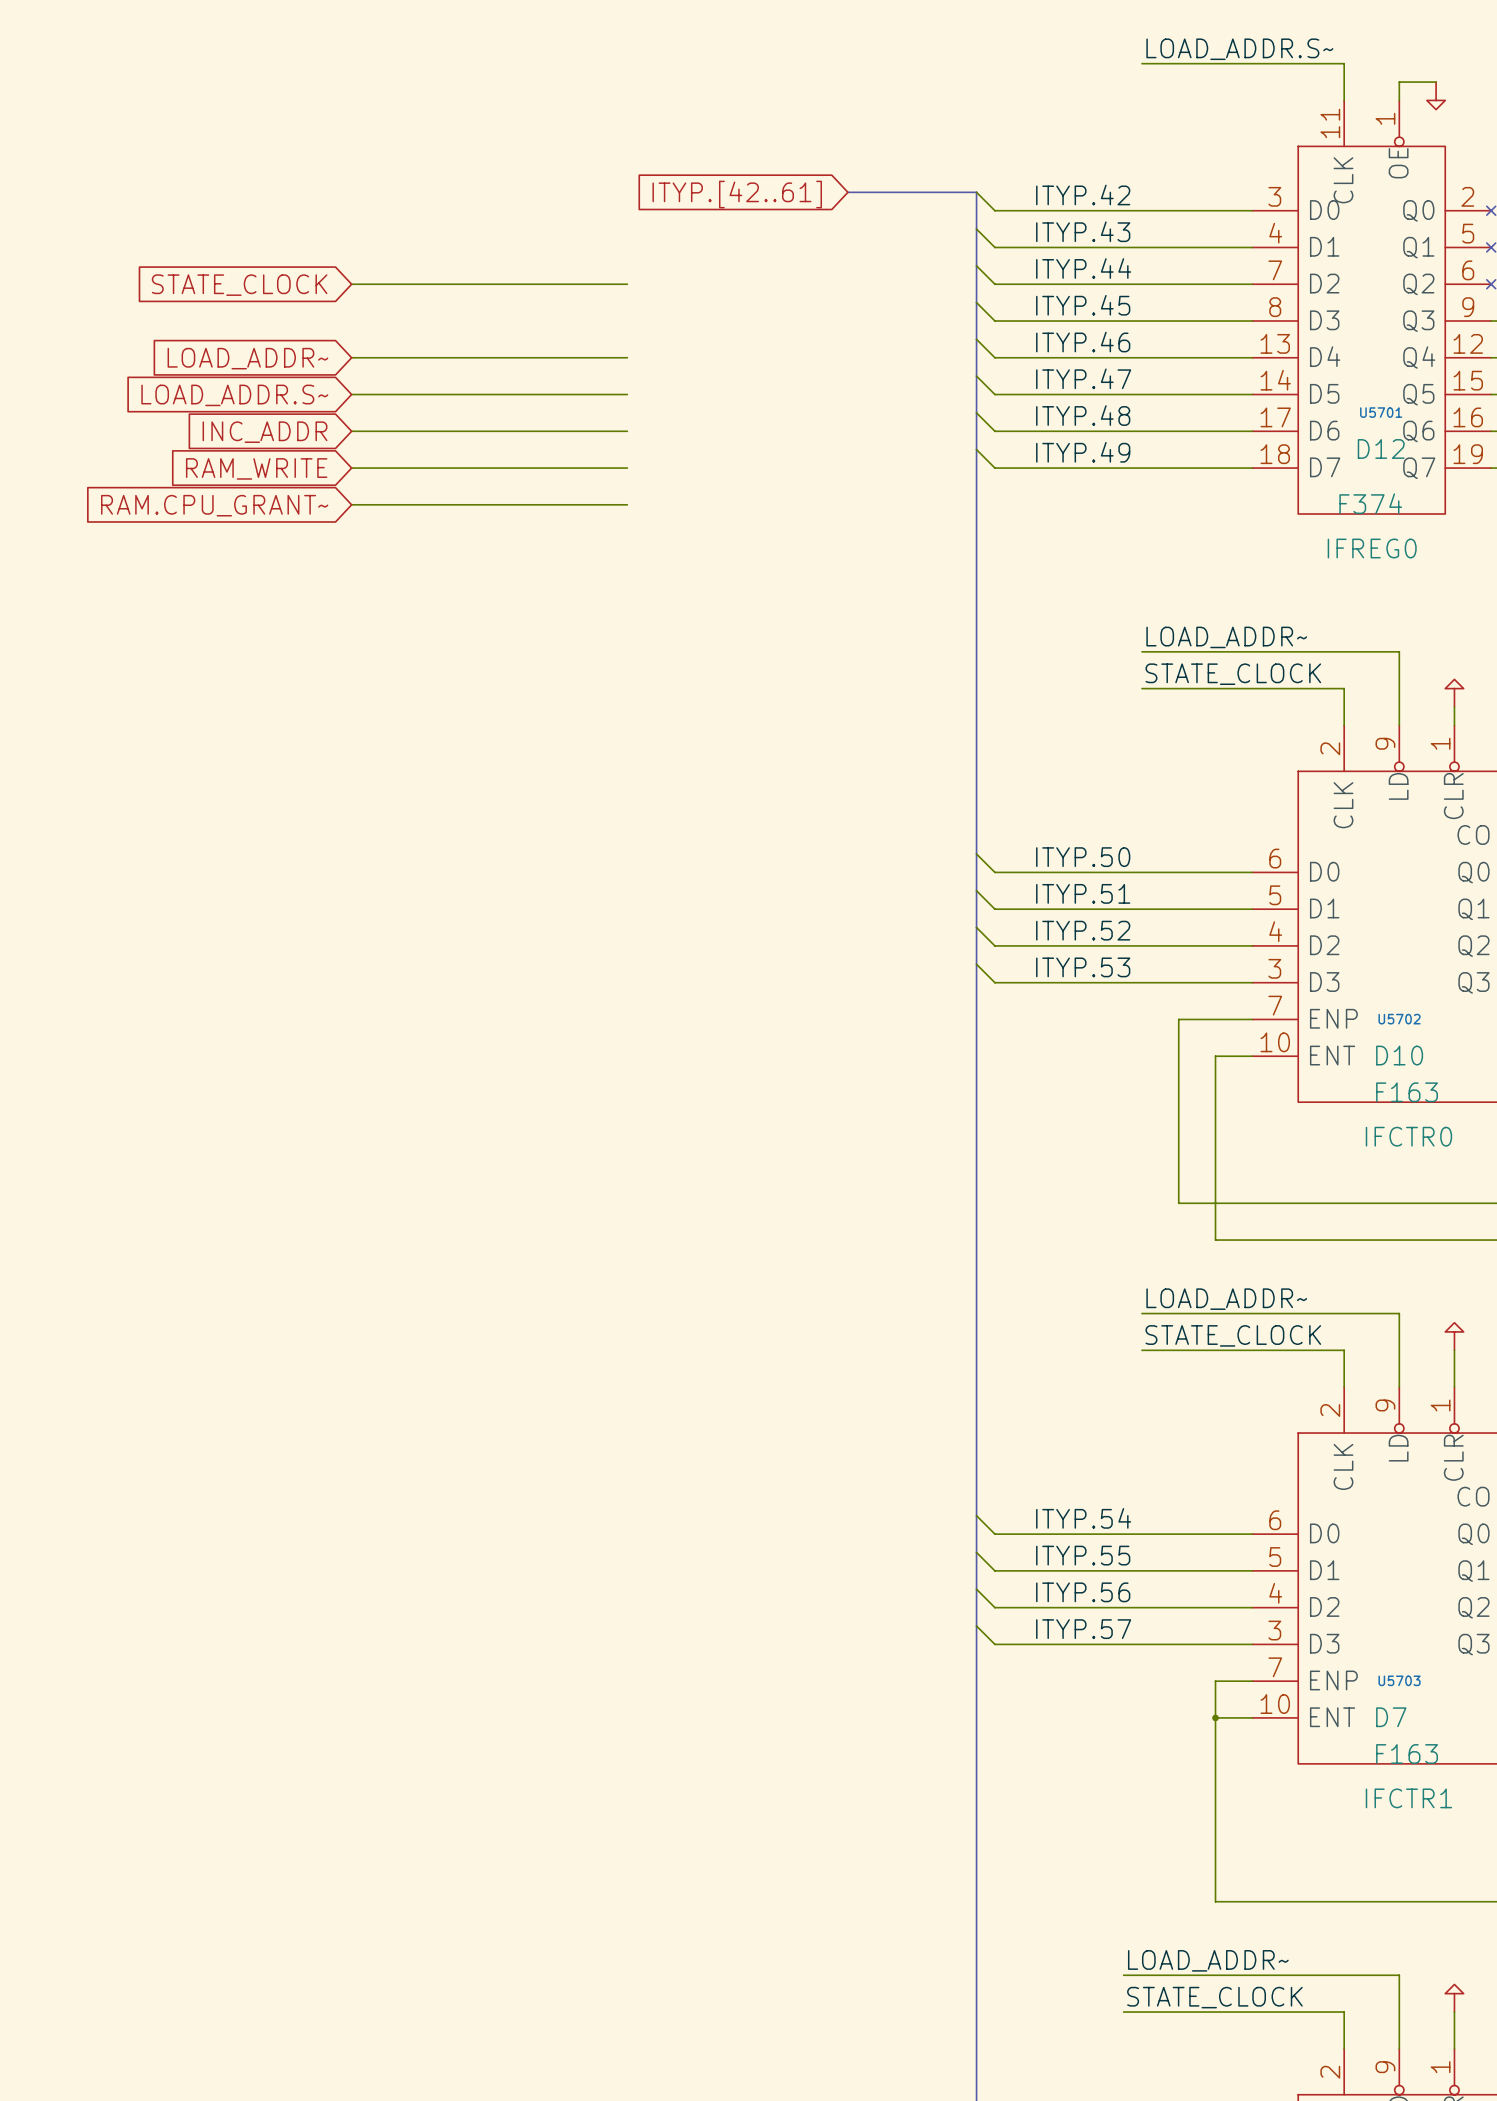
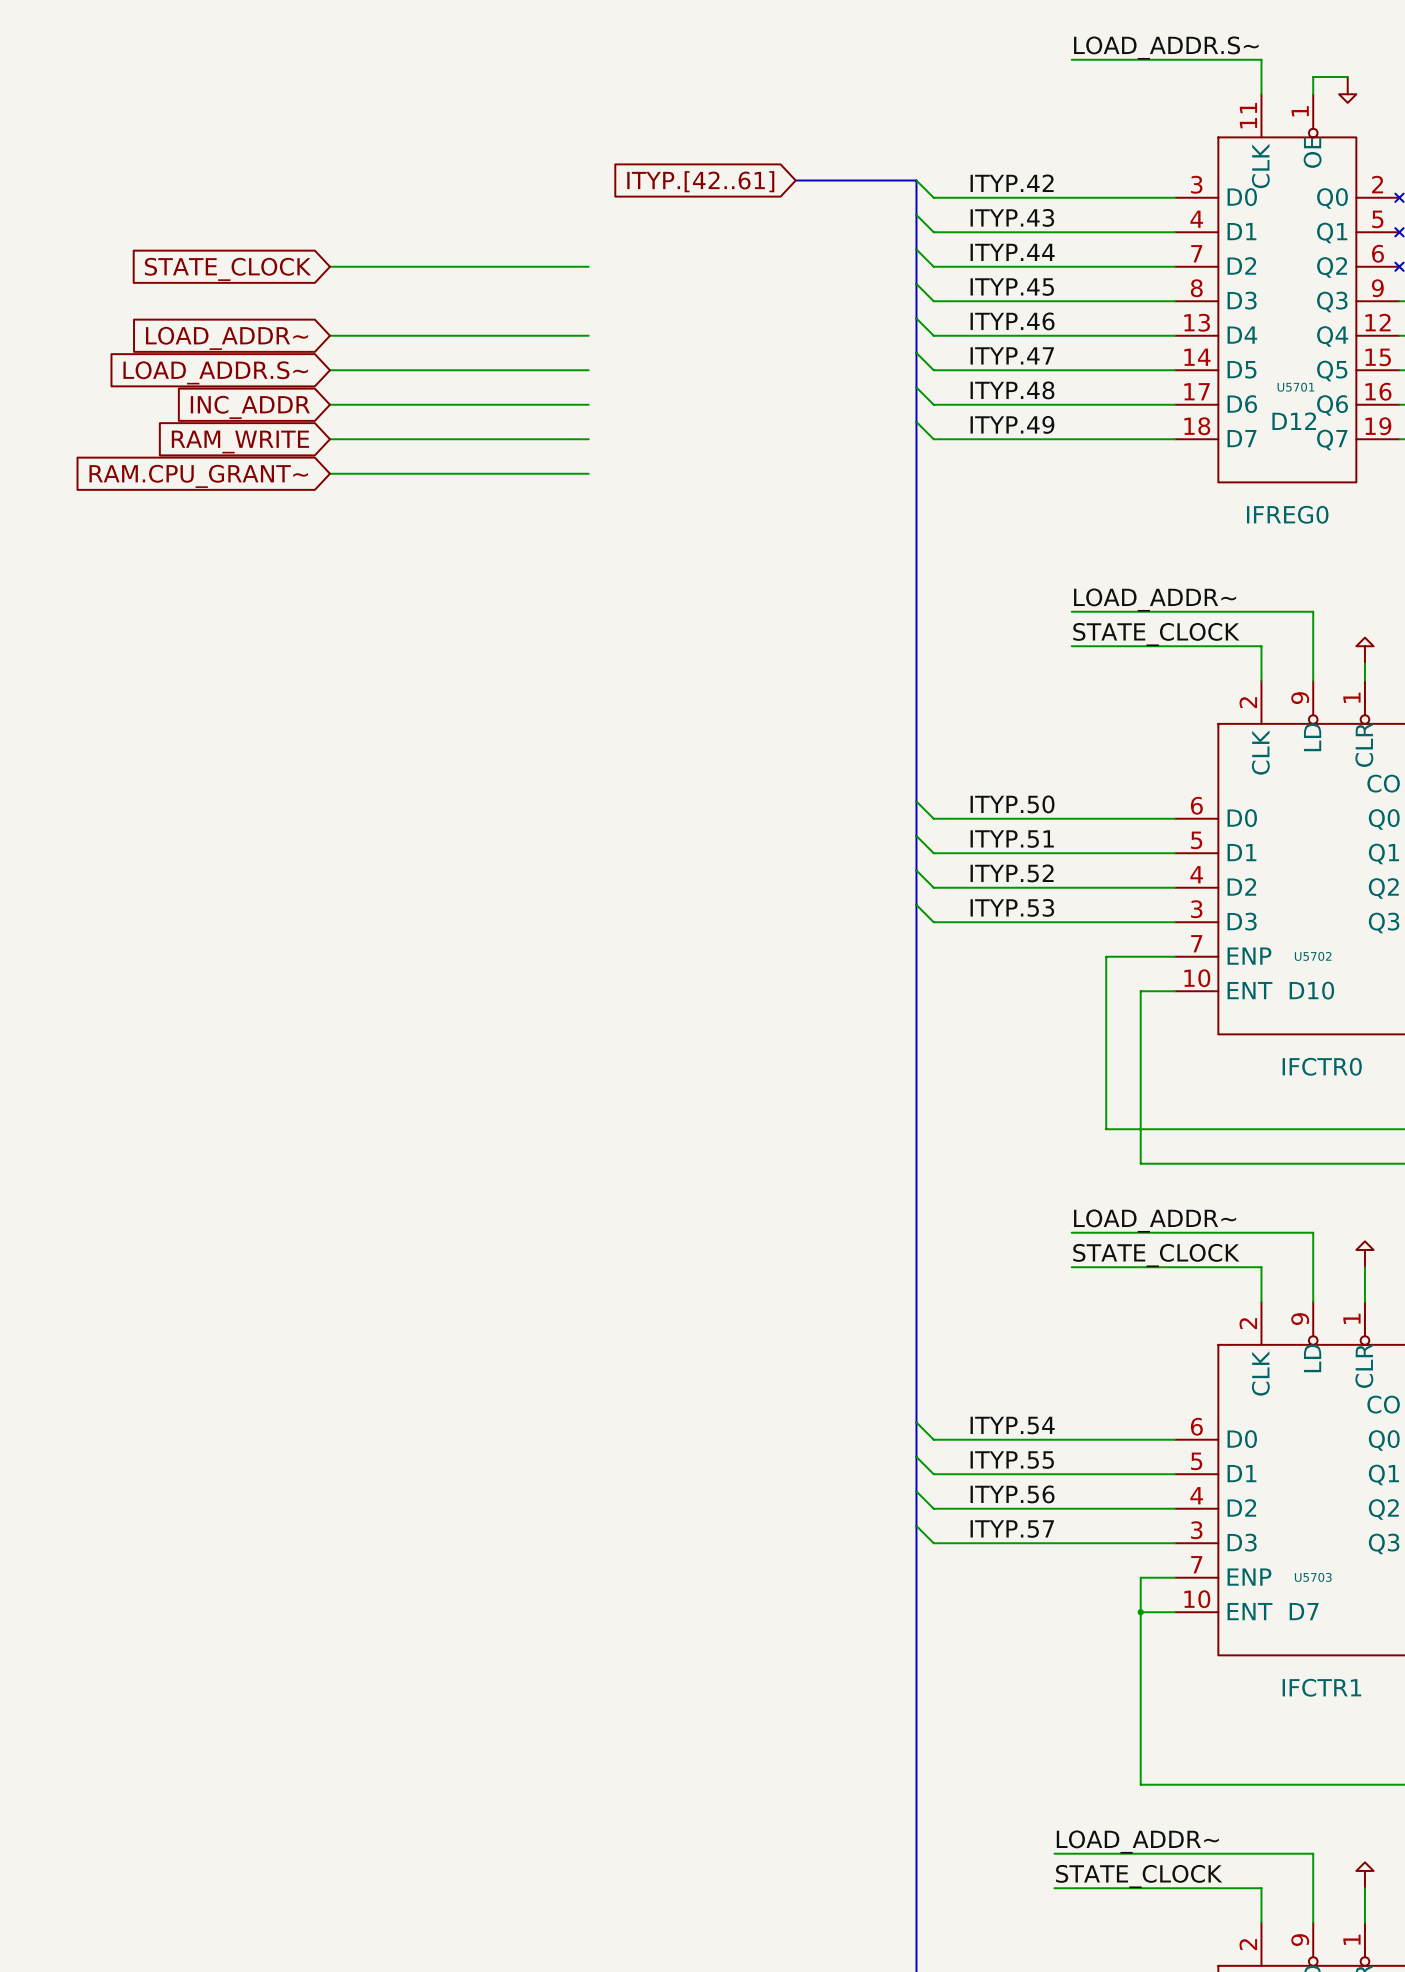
U5701 value: F374 (1370, 503) -> none
U5702 value: F163 (1407, 1092) -> none
U5703 value: F163 (1407, 1754) -> none

